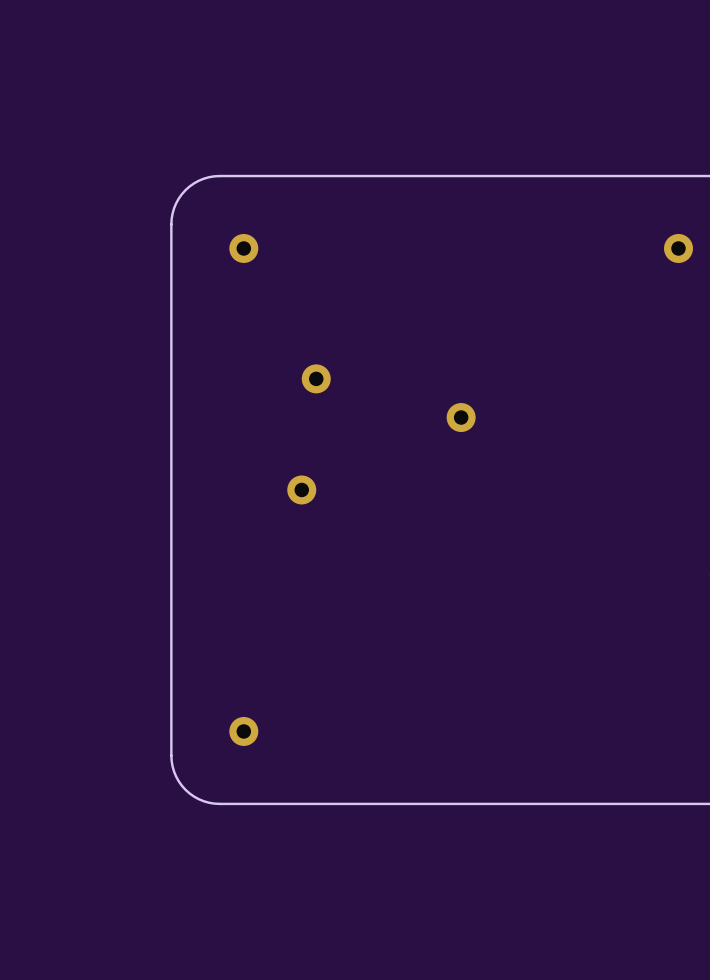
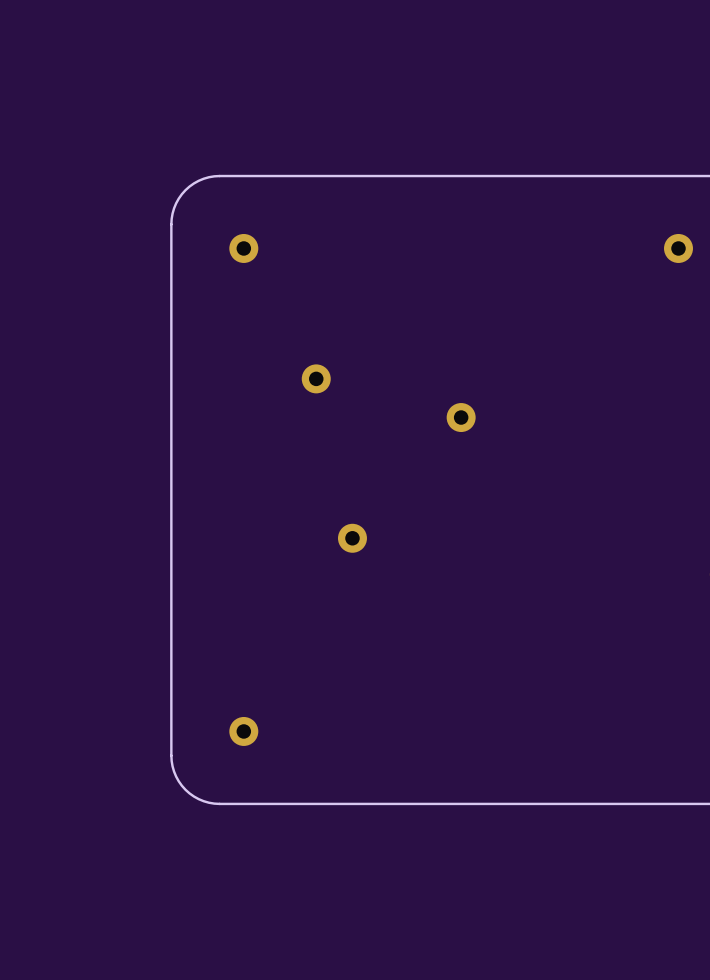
via position: (301, 489) -> (352, 538)

